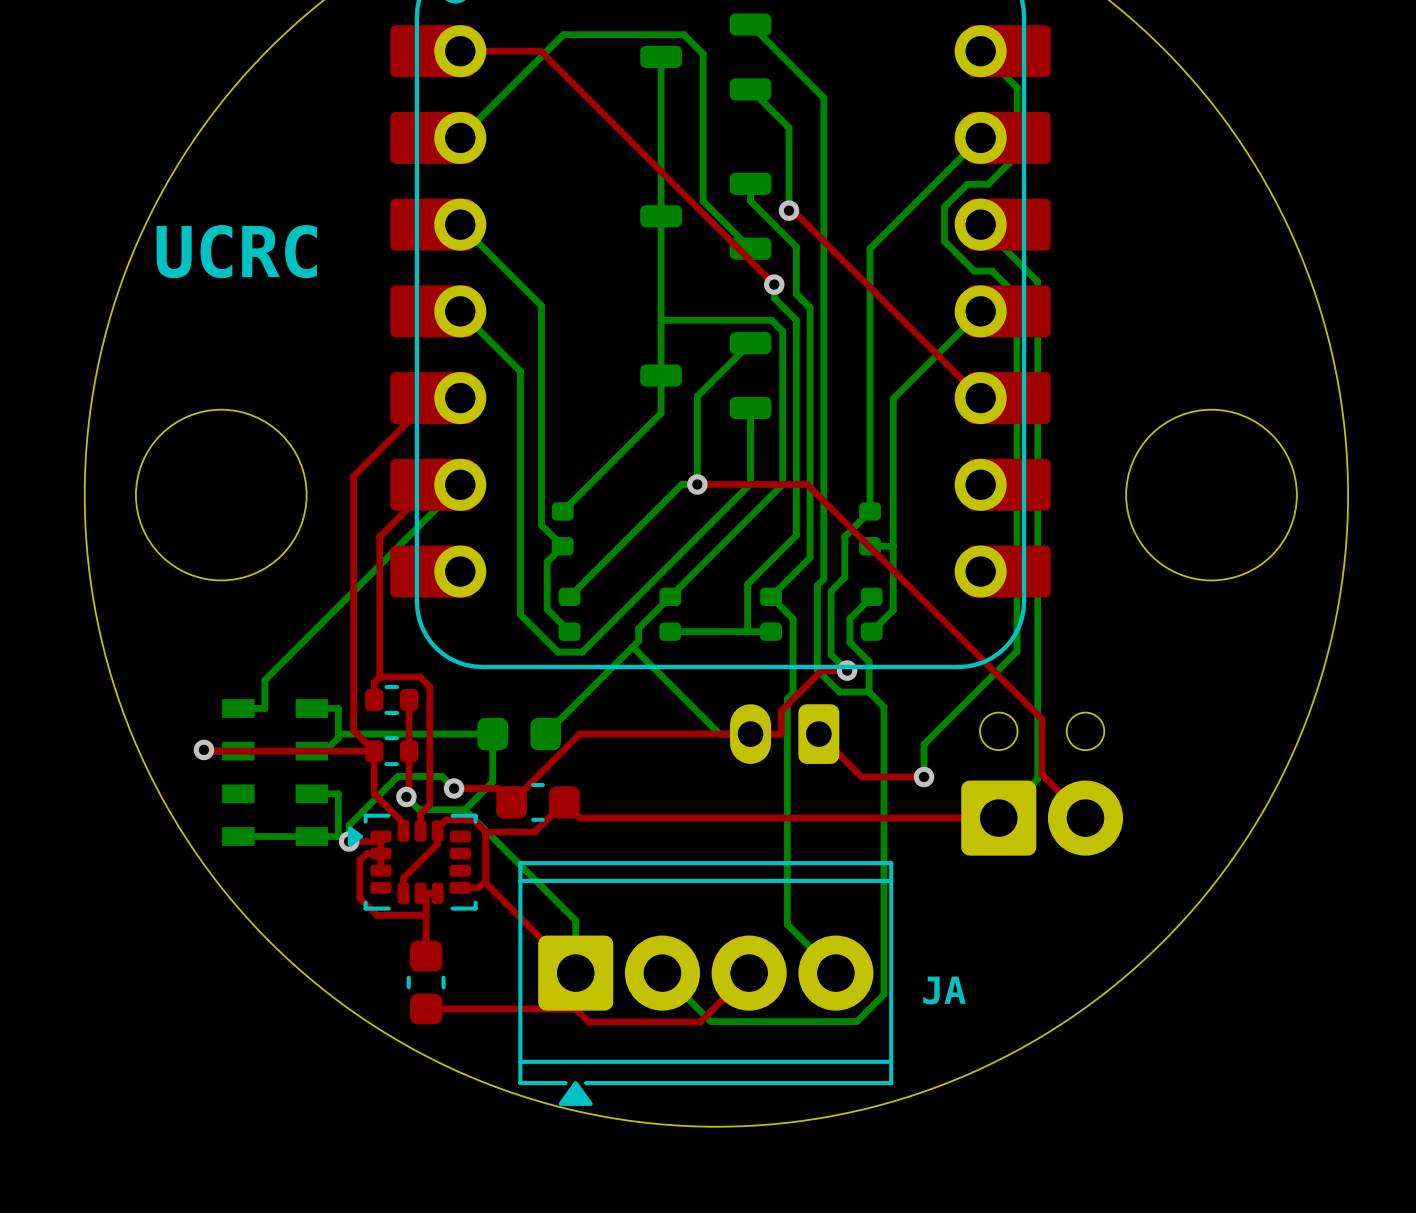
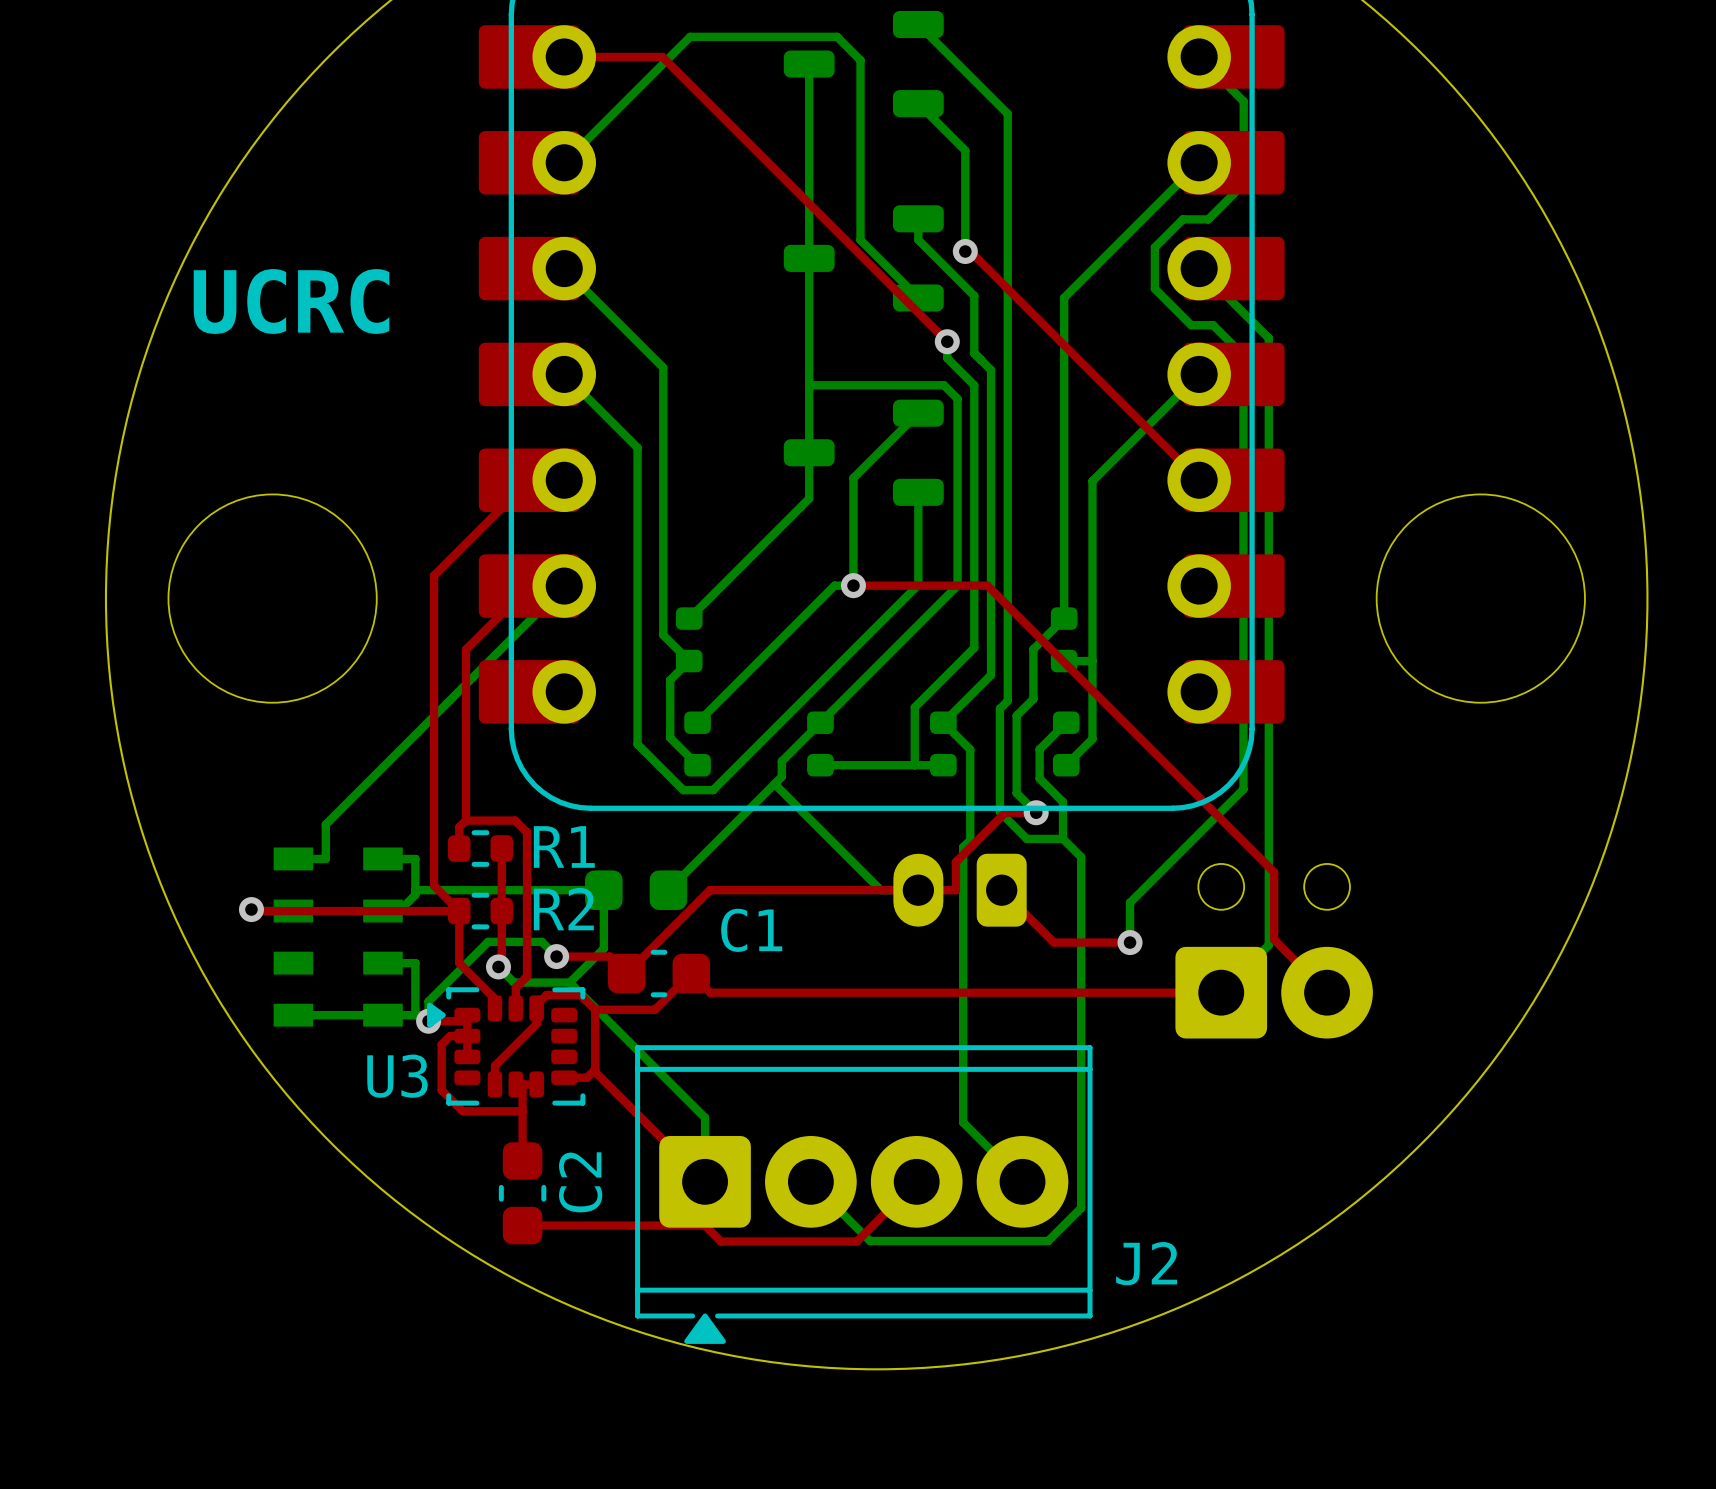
R1 name: none -> R1 (564, 846)
R2 name: none -> R2 (563, 909)
C1 name: none -> C1 (751, 930)
U3 name: none -> U3 (397, 1076)
C2 name: none -> C2 (580, 1182)
text: JA (944, 990) -> none
J2 name: none -> J2 (1146, 1263)

